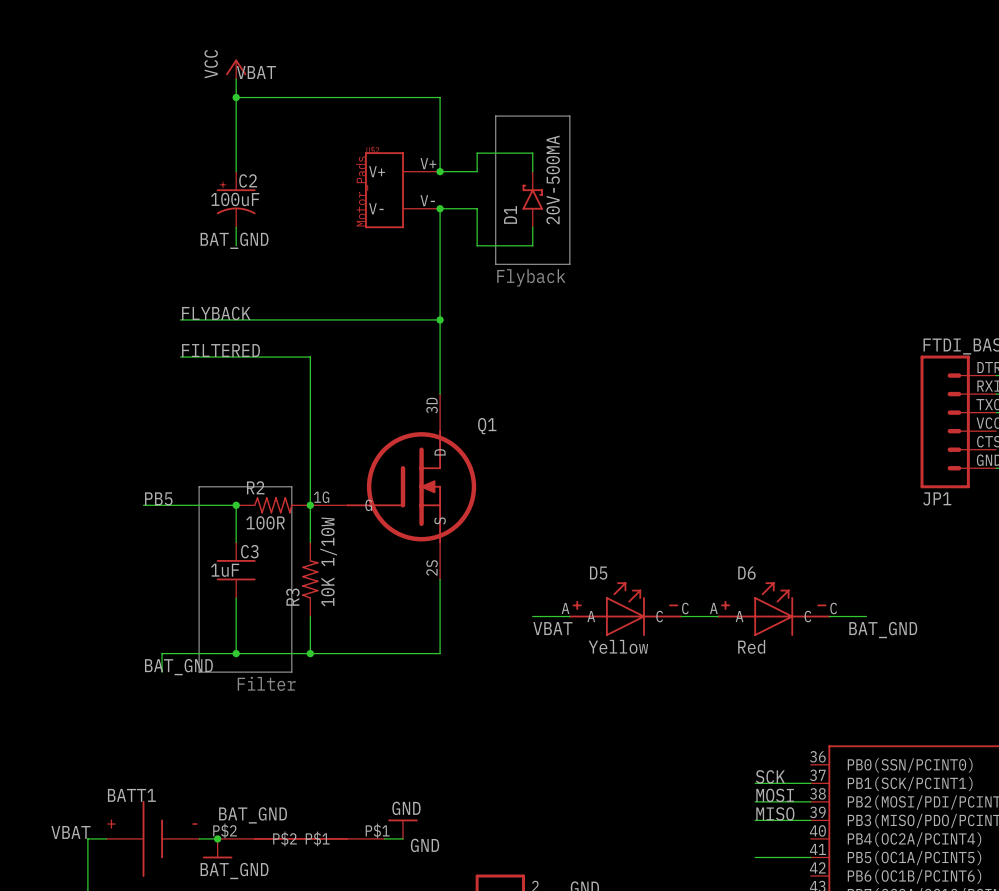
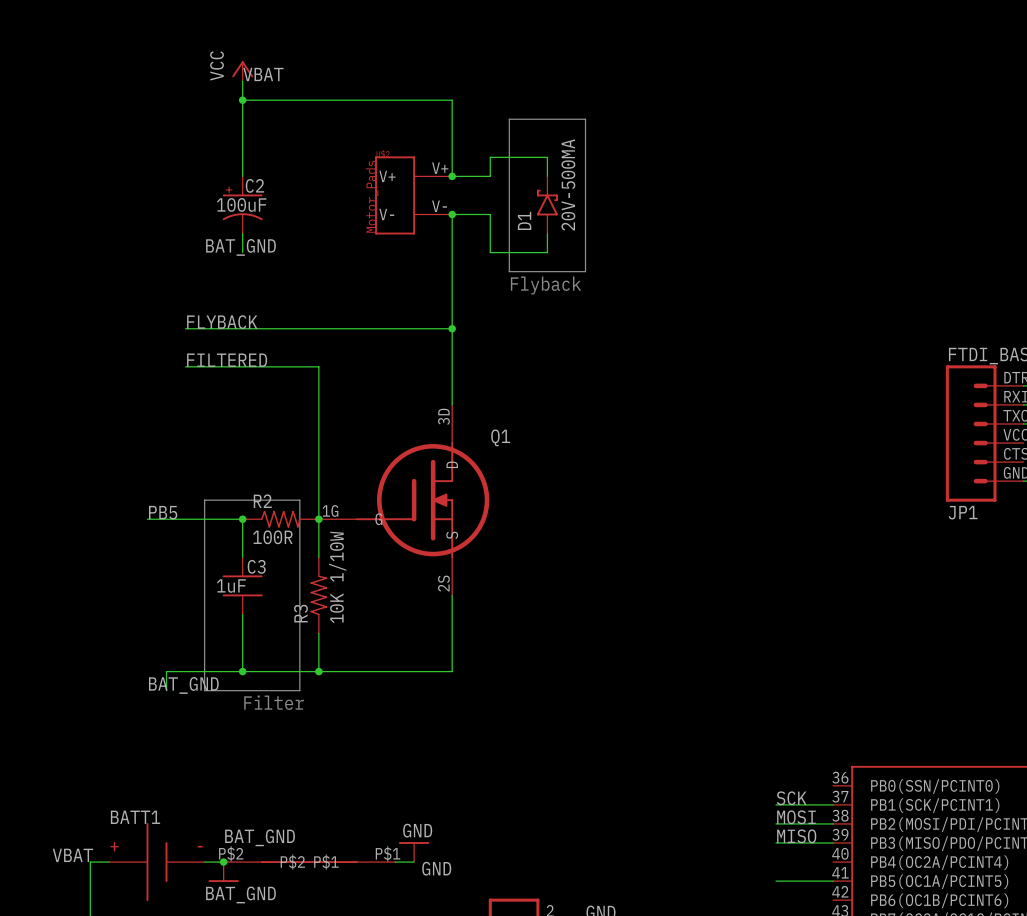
D5: Yellow (625, 609) -> none
D6: Red (773, 609) -> none
wire: (532, 616) (569, 616) -> none
wire: (681, 616) (718, 616) -> none
wire: (829, 616) (866, 616) -> none
label: VBAT (552, 628) -> none
label: BAT_GND (883, 630) -> none

